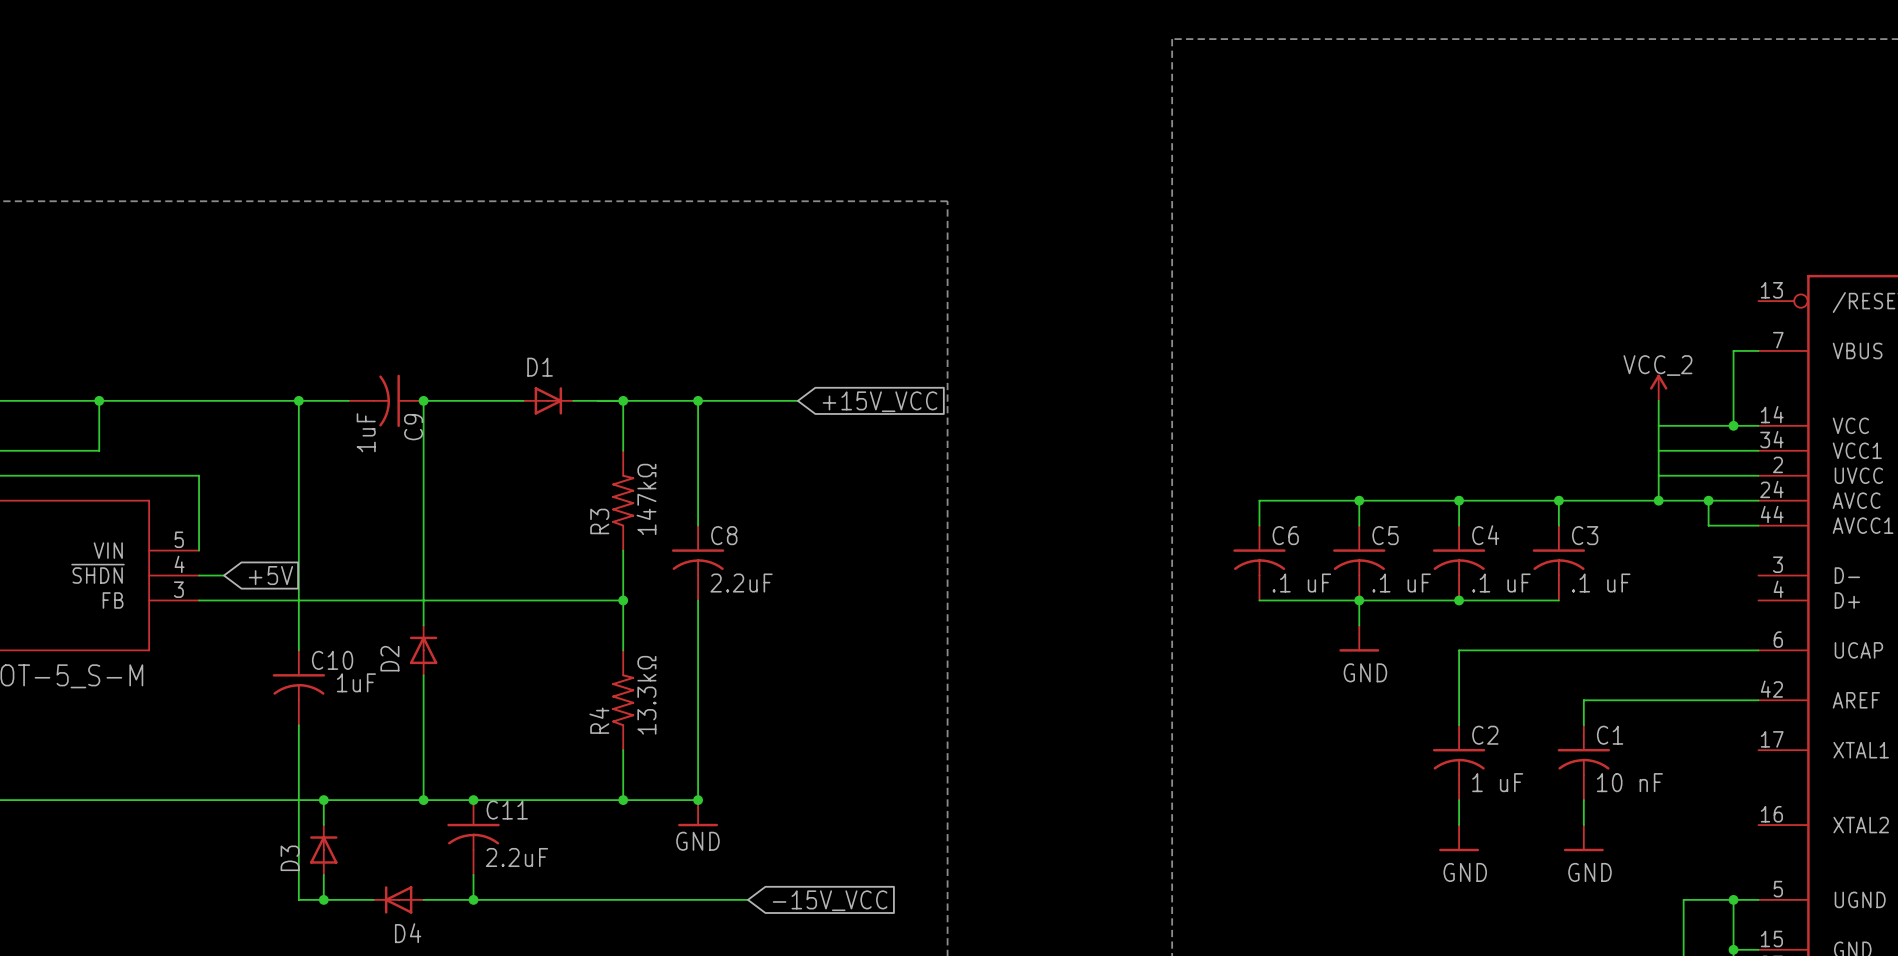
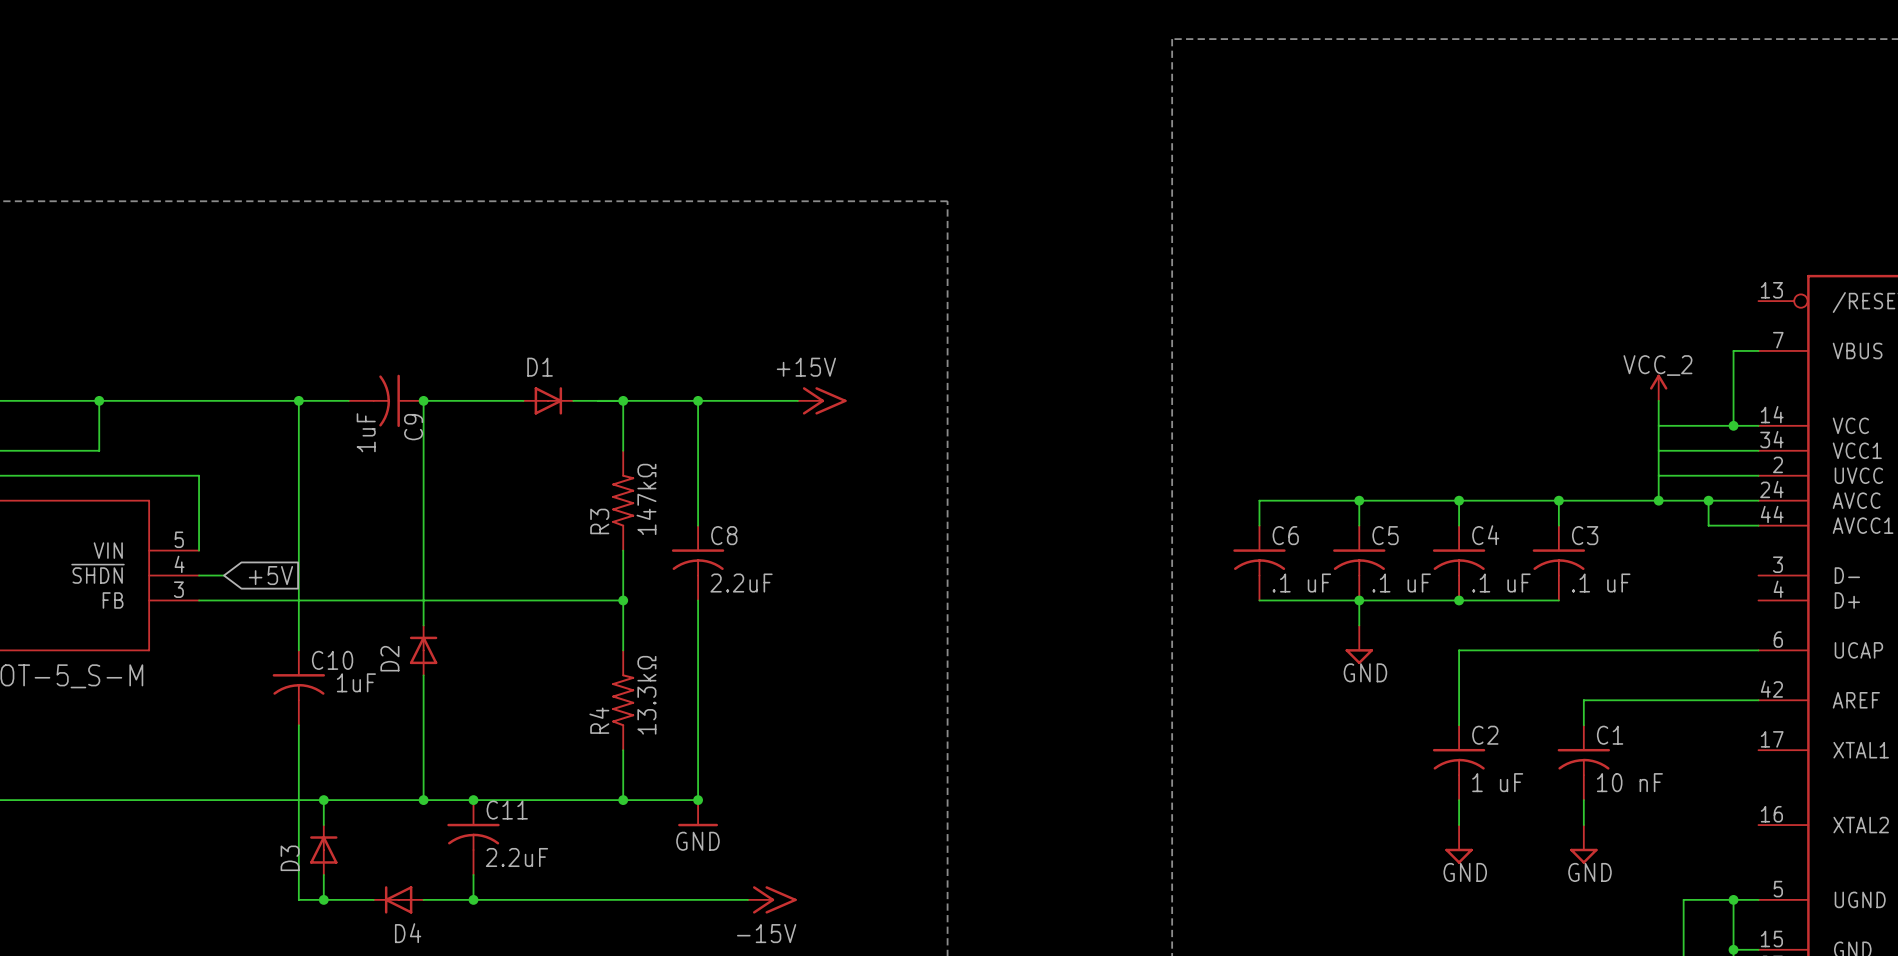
power symbol: none -> +15V (822, 400)
global label: +15V_VCC (880, 401) -> none
power symbol shape: [1339, 625, 1380, 652] -> [1345, 625, 1374, 665]
power symbol shape: [1439, 825, 1480, 852] -> [1445, 825, 1473, 864]
power symbol shape: [1563, 825, 1604, 852] -> [1570, 825, 1598, 864]
power symbol: none -> -15V (772, 899)
global label: -15V_VCC (830, 900) -> none

